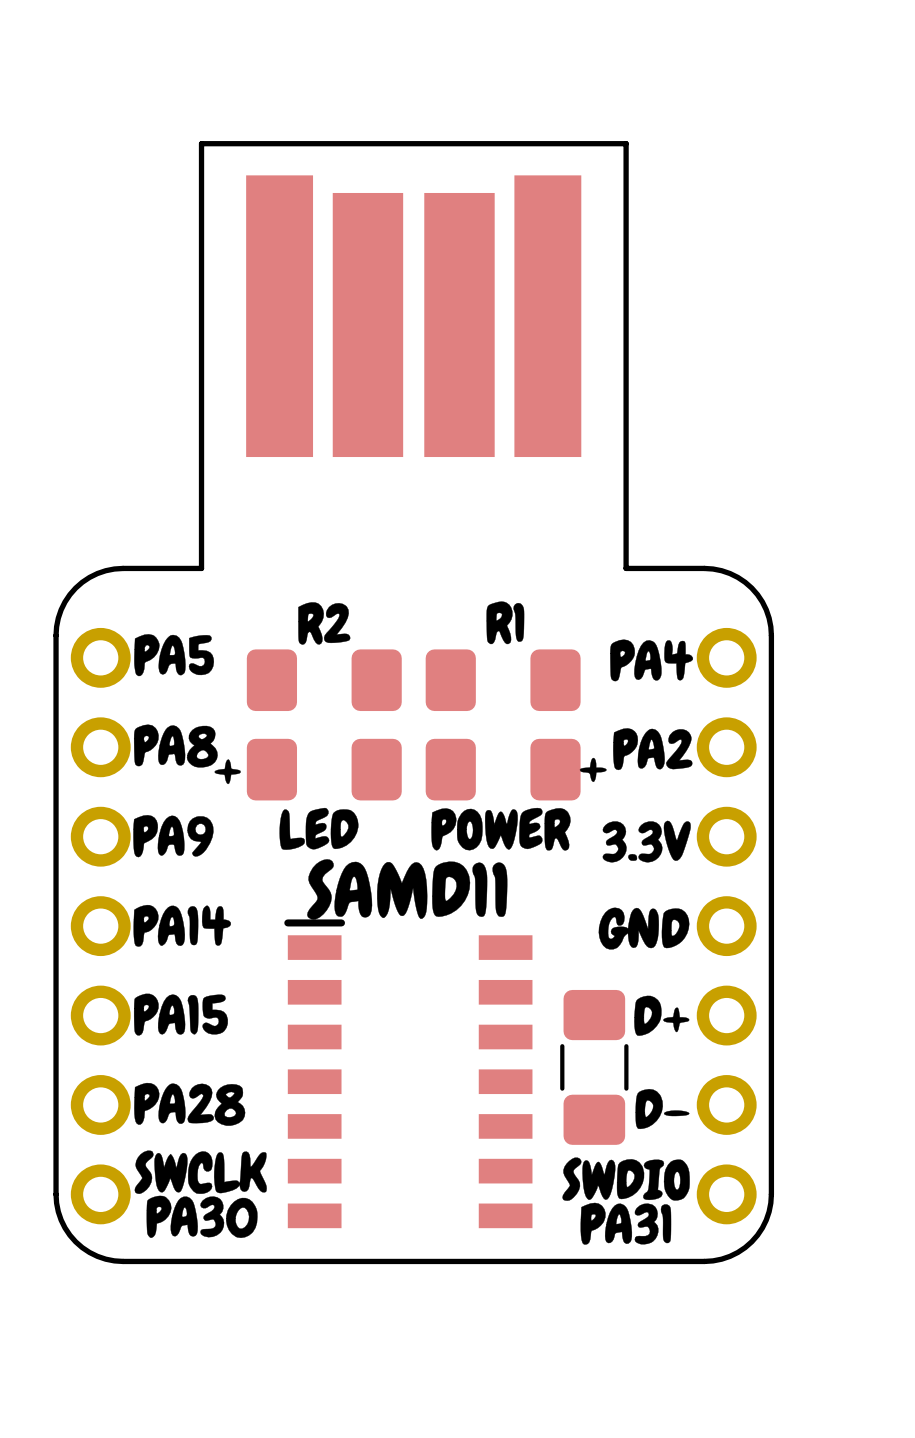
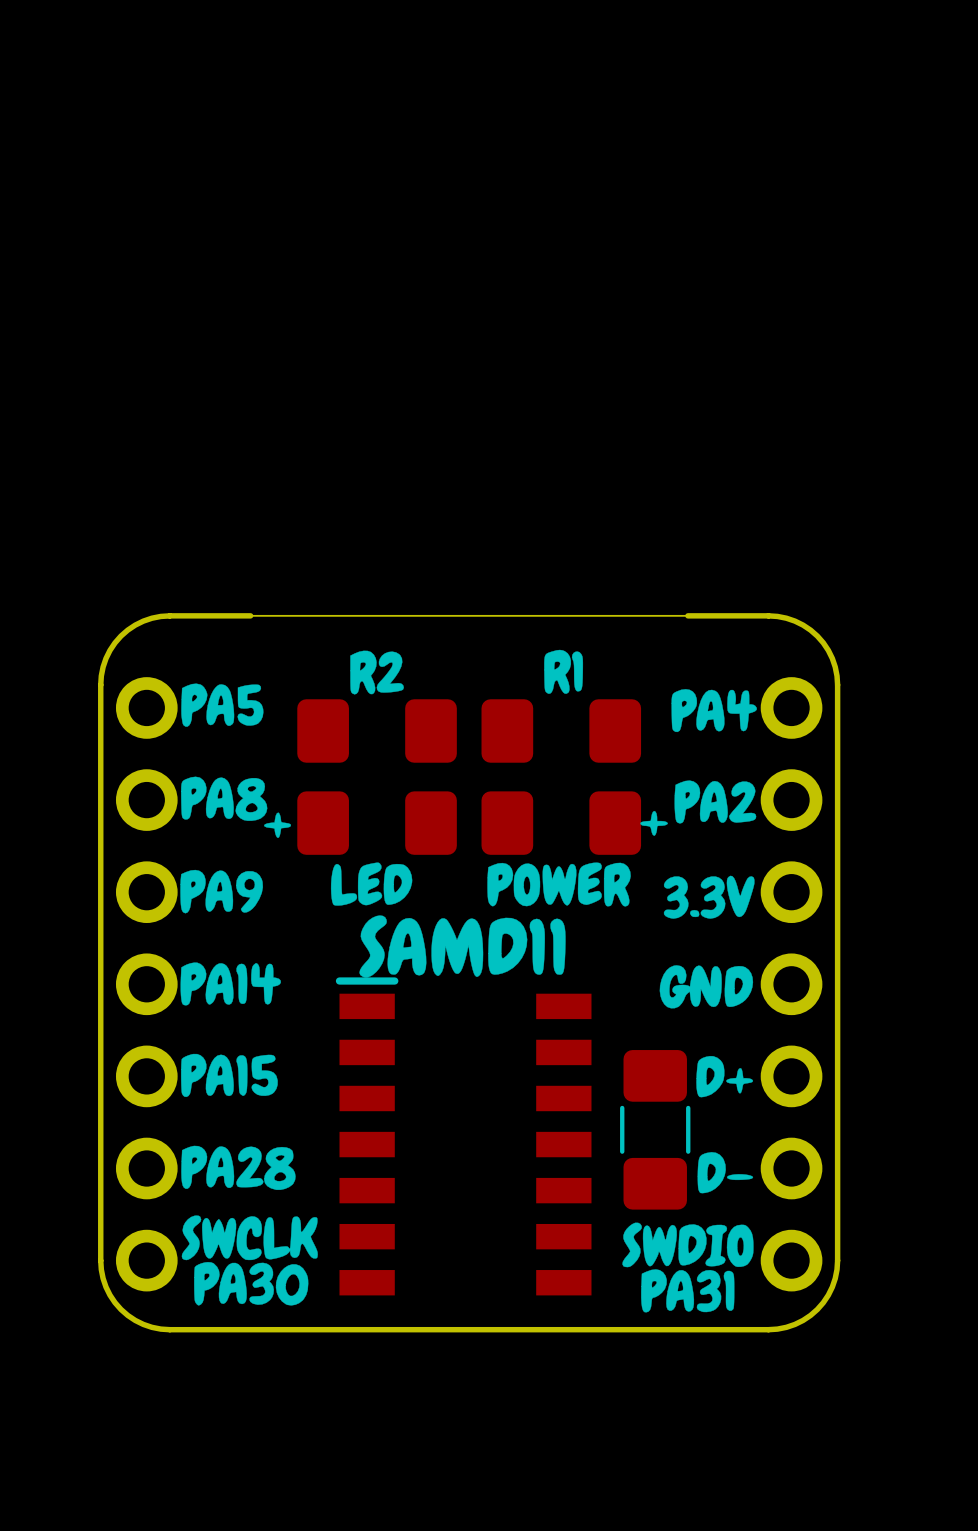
part: (413, 316) -> none
board edge: (201, 568) (201, 143) (626, 143) (626, 568) -> (250, 615) (687, 615)

